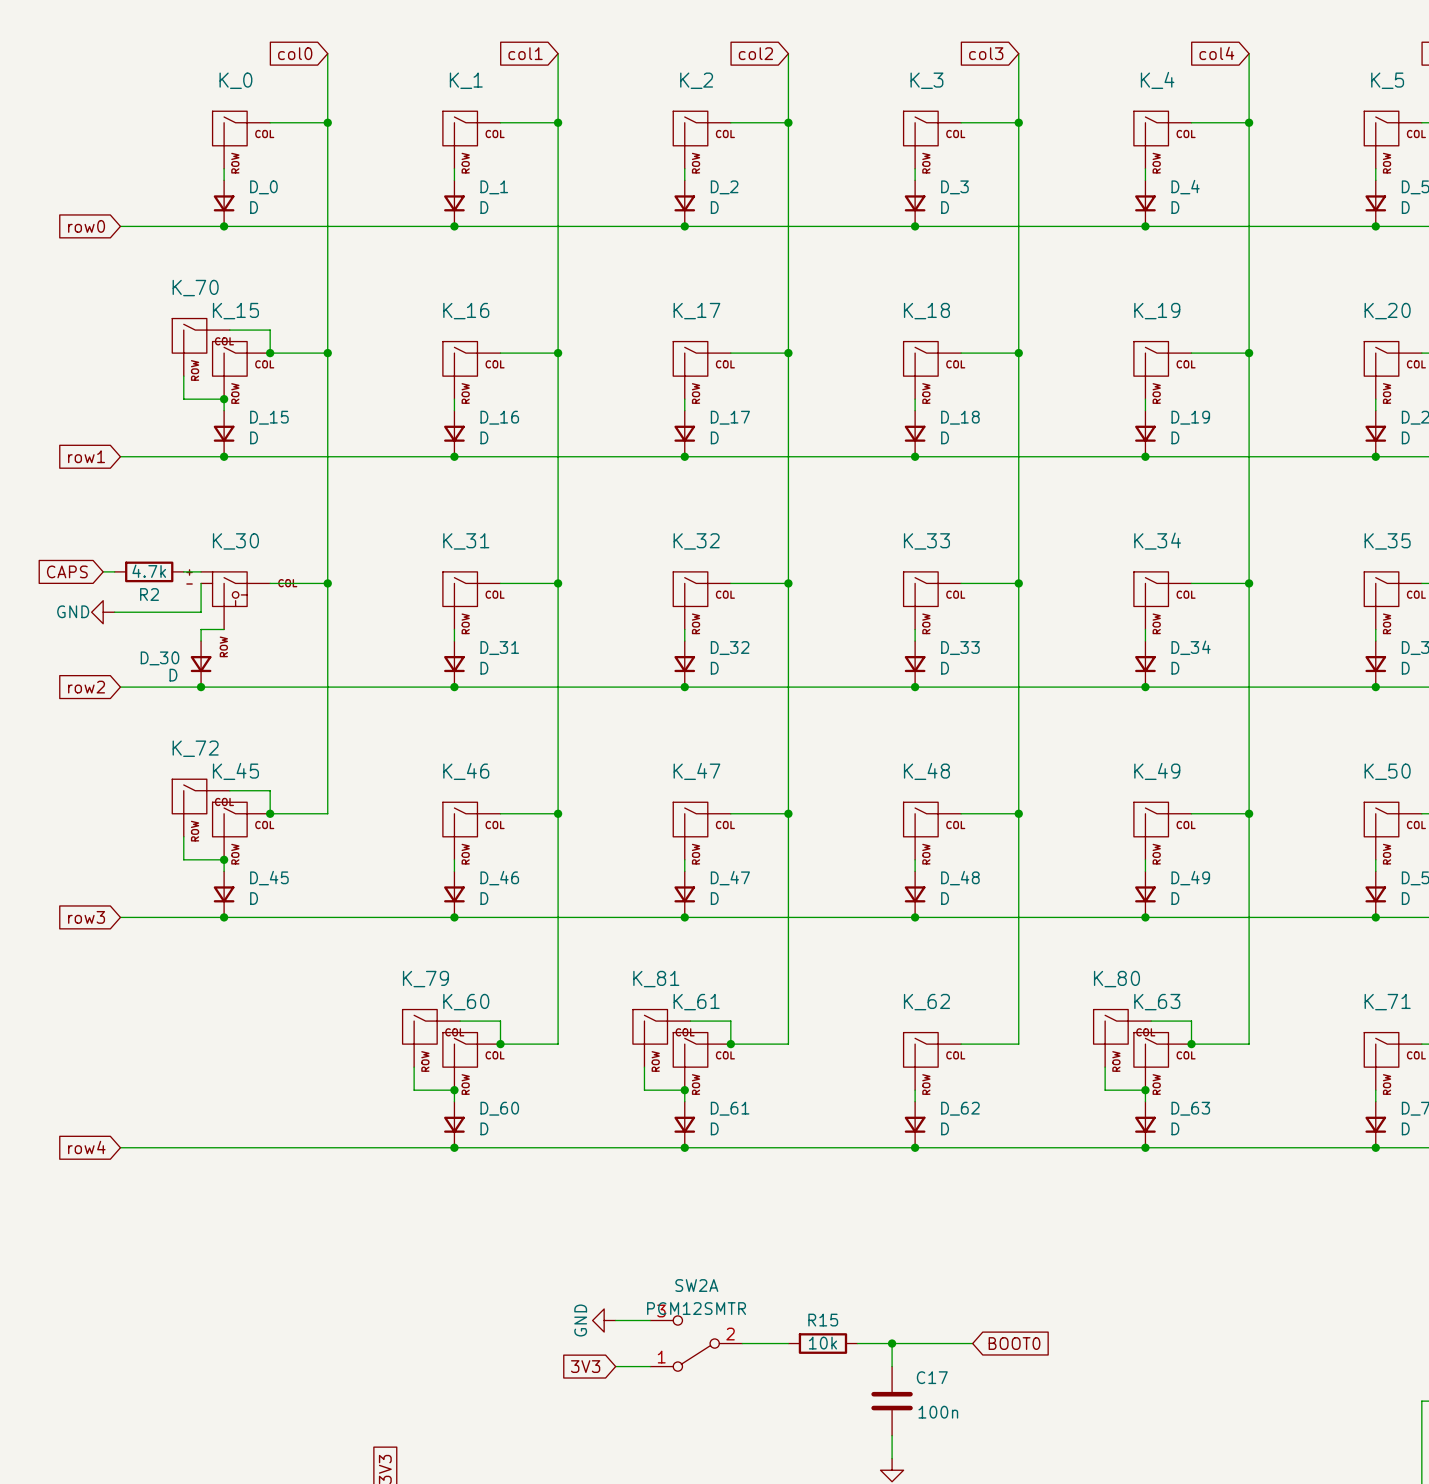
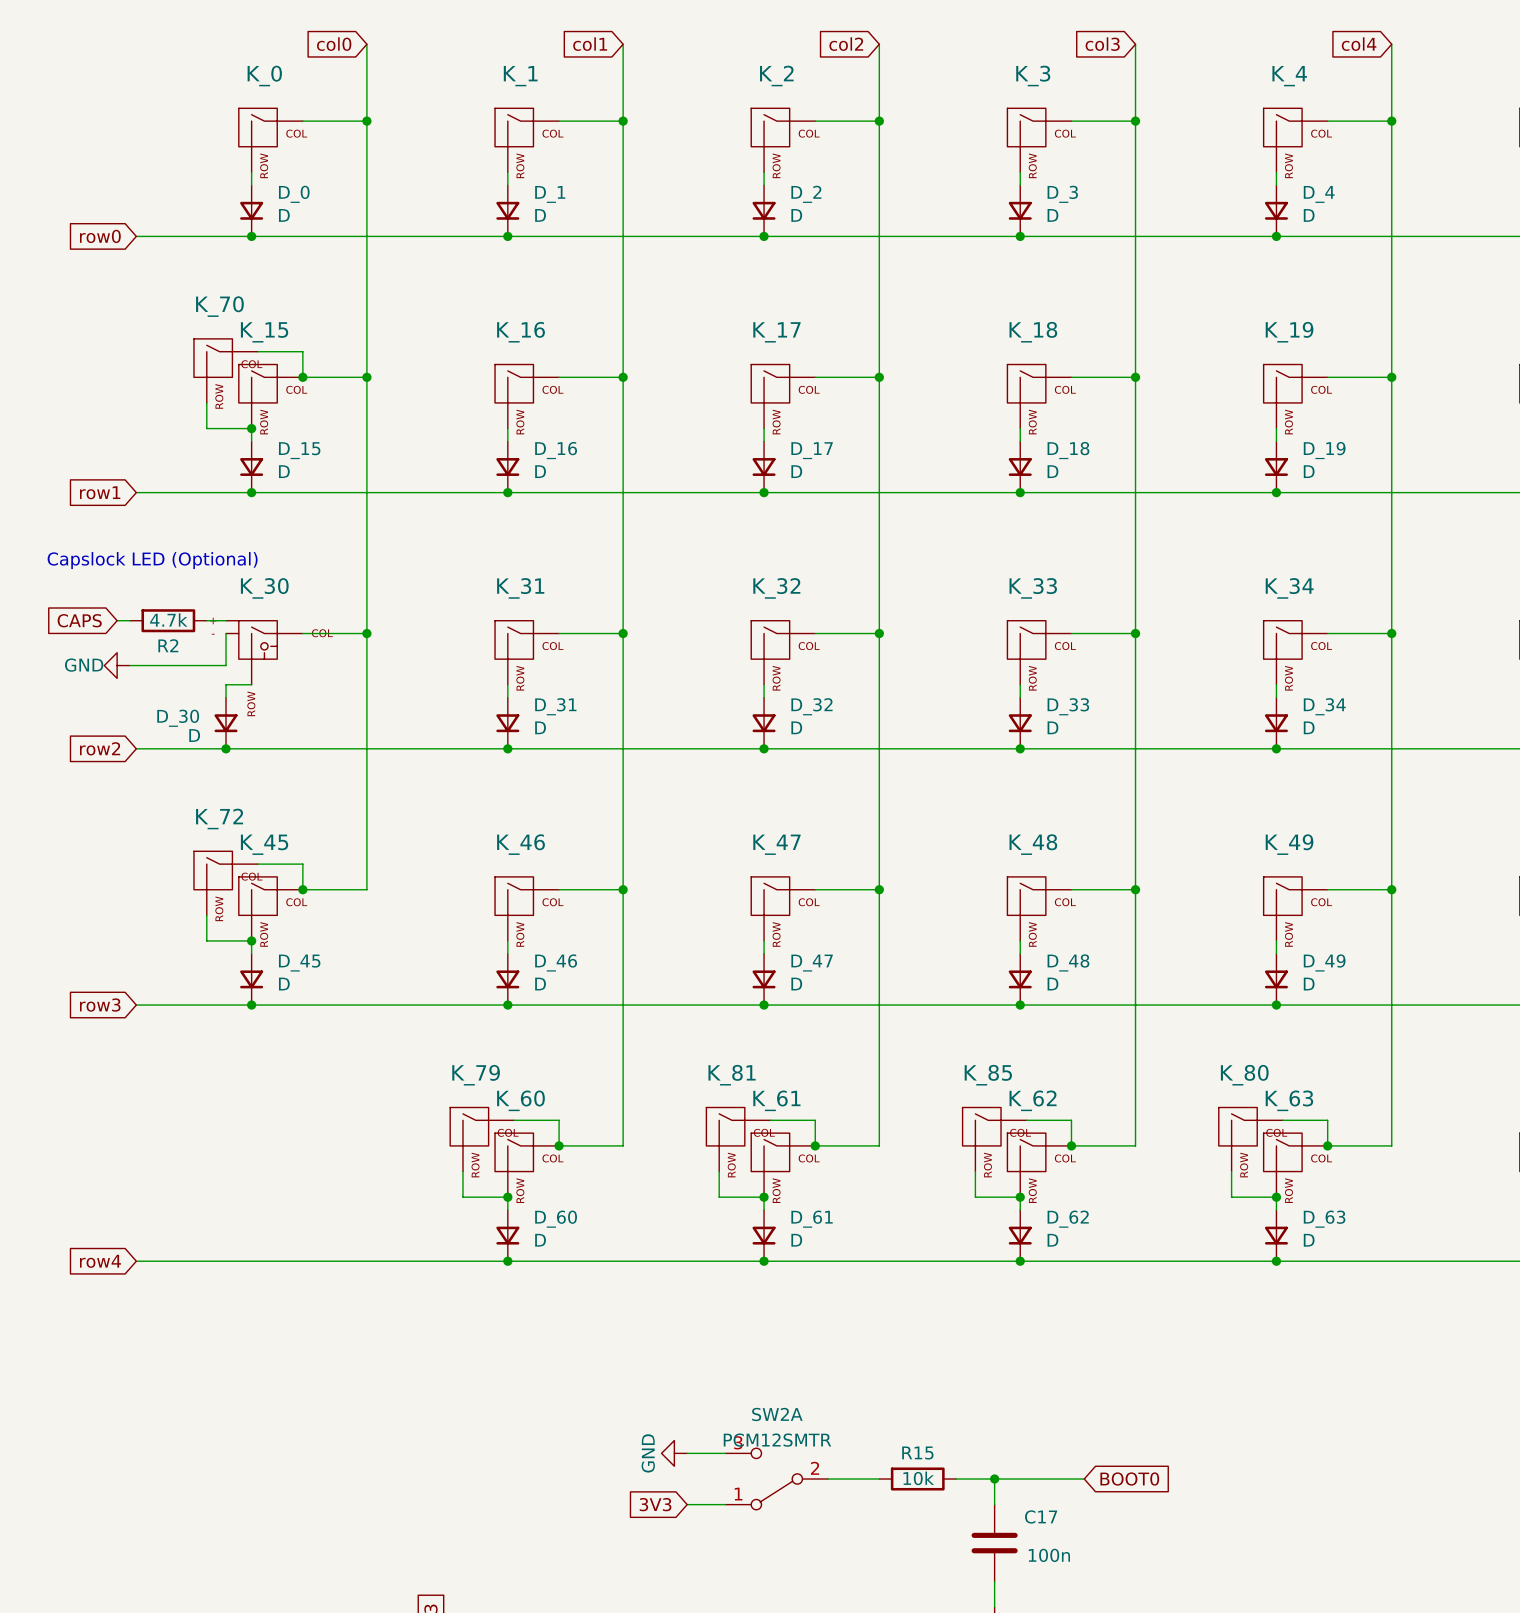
text: none -> Capslock LED (Optional) (152, 560)
wire: none -> (1026, 1120) (1071, 1120) (1071, 1145)
K_85: none -> (994, 1139)
junction: none -> (1071, 1145)
wire: none -> (975, 1171) (975, 1197) (1020, 1197)
junction: none -> (1020, 1197)

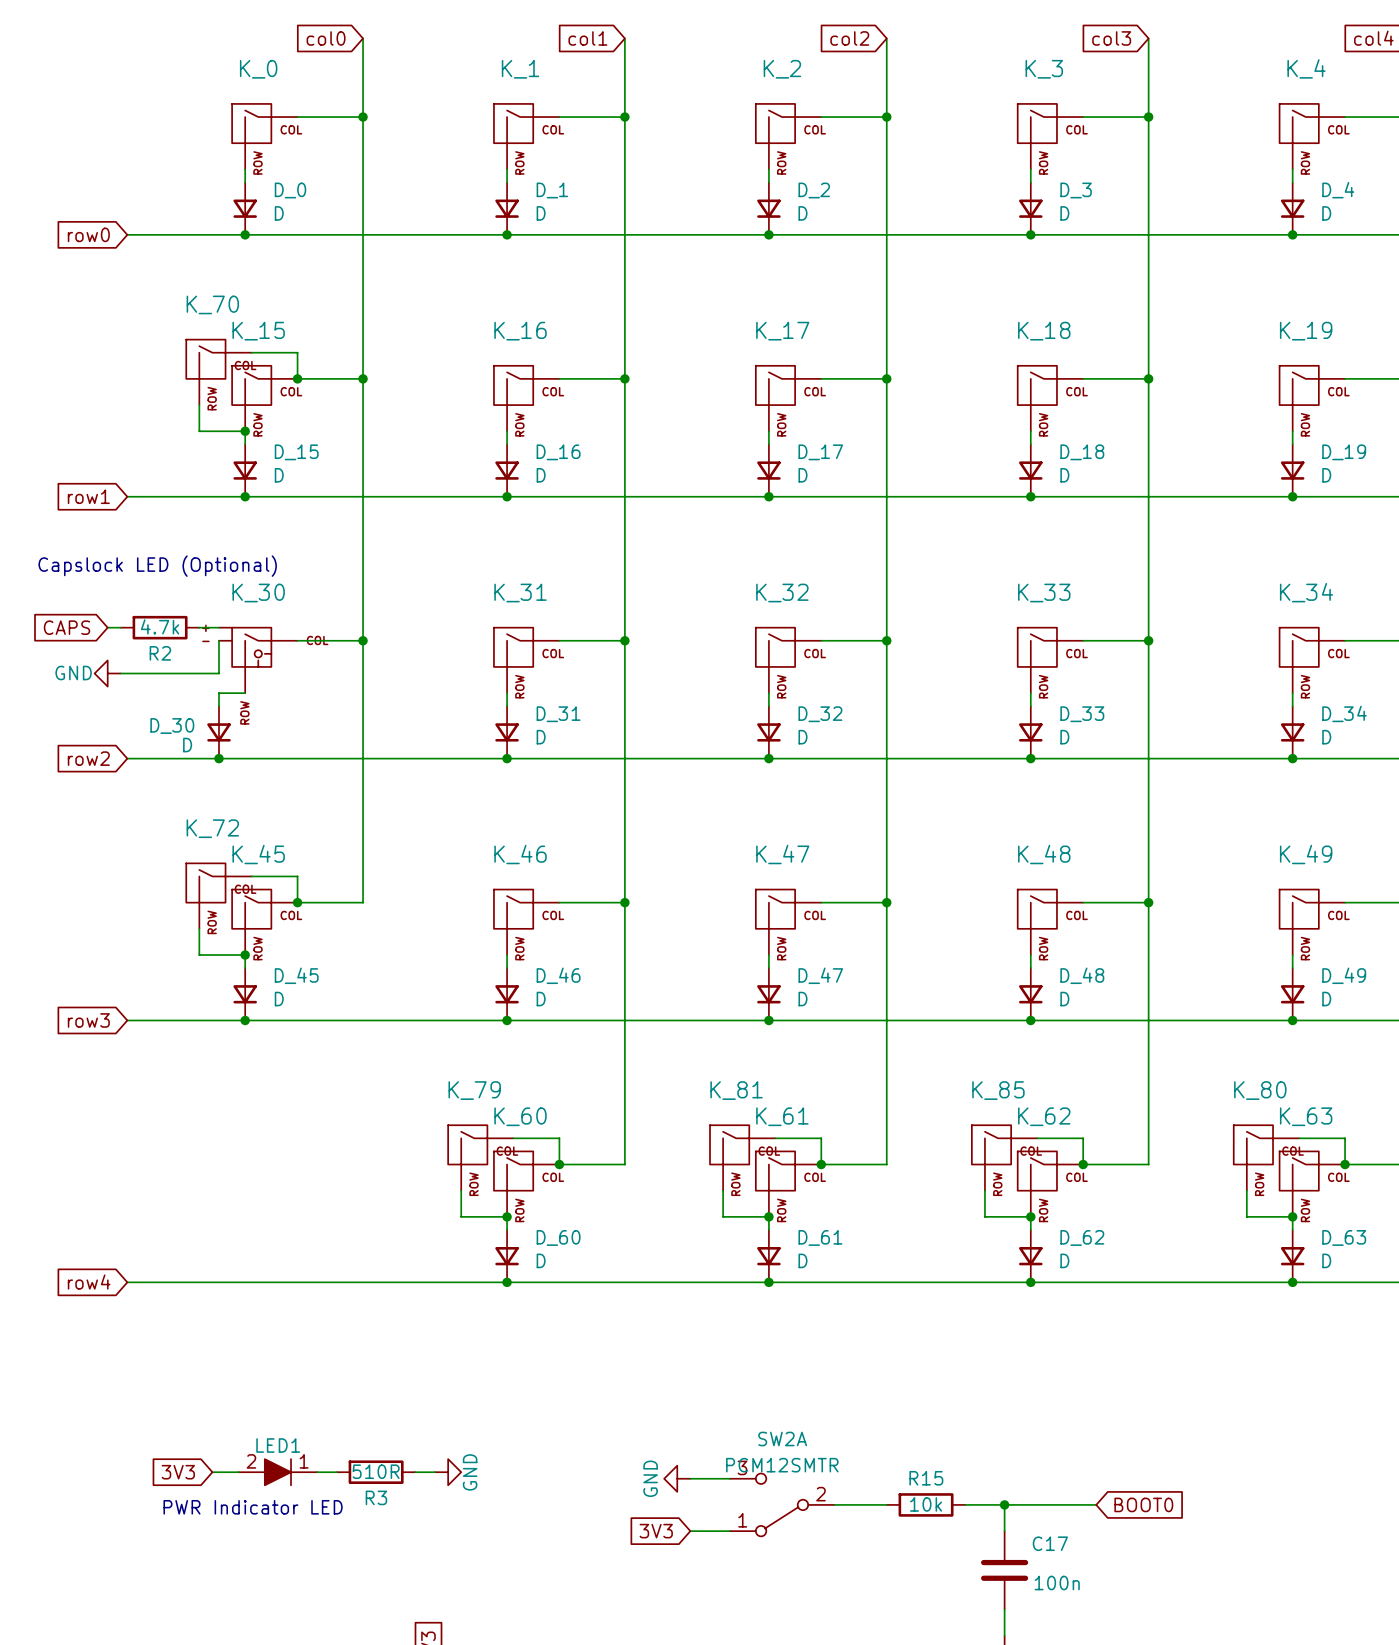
global label: none -> 3V3 (178, 1472)
wire: none -> (212, 1472) (238, 1472)
LED1: none -> (277, 1472)
wire: none -> (317, 1472) (336, 1472)
R3: none -> 510R (376, 1472)
wire: none -> (415, 1472) (435, 1472)
power symbol: none -> GND (448, 1472)
text: none -> PWR Indicator LED (253, 1507)

